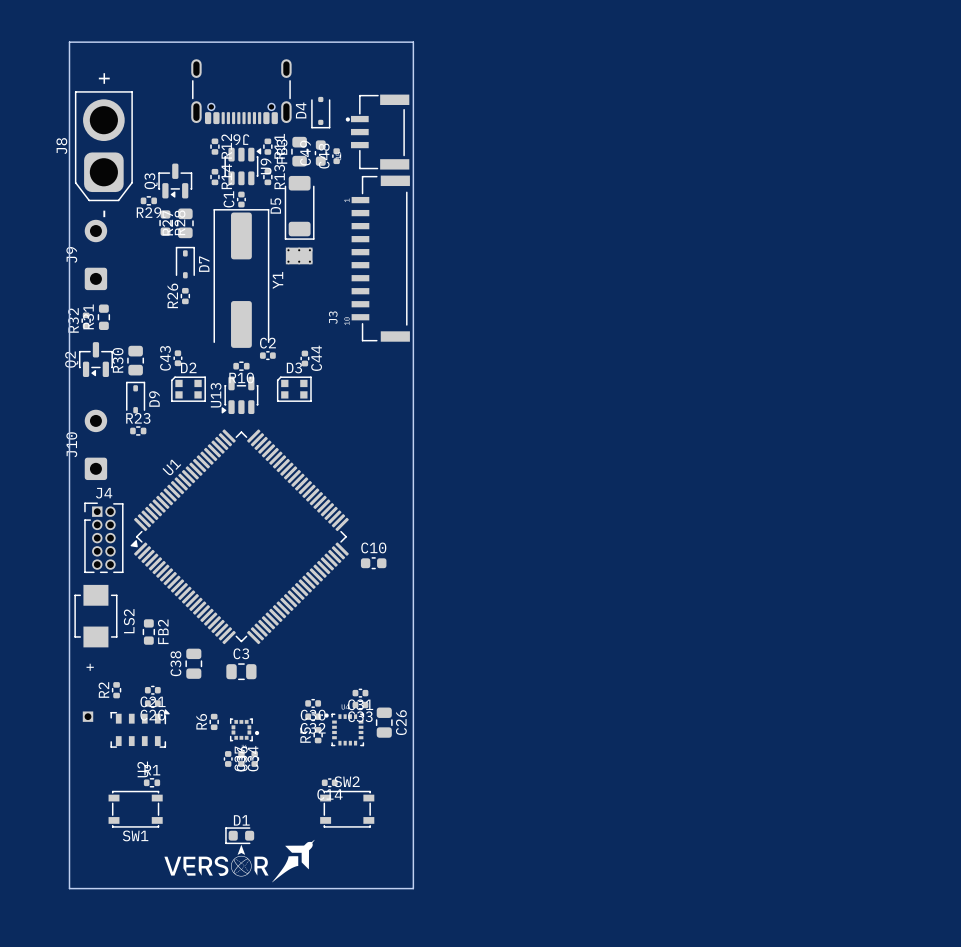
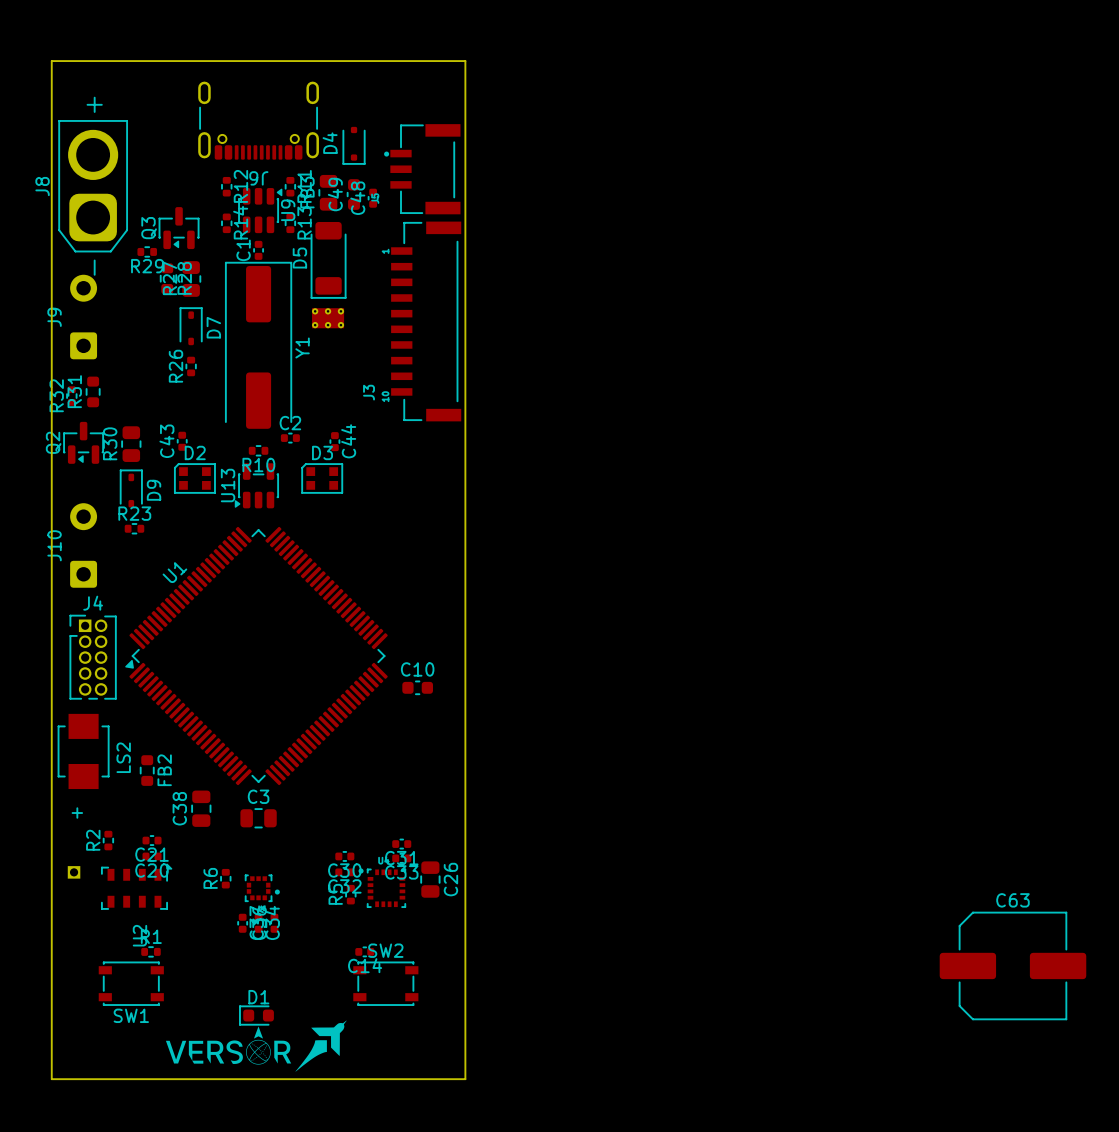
C63: none -> (1012, 965)

